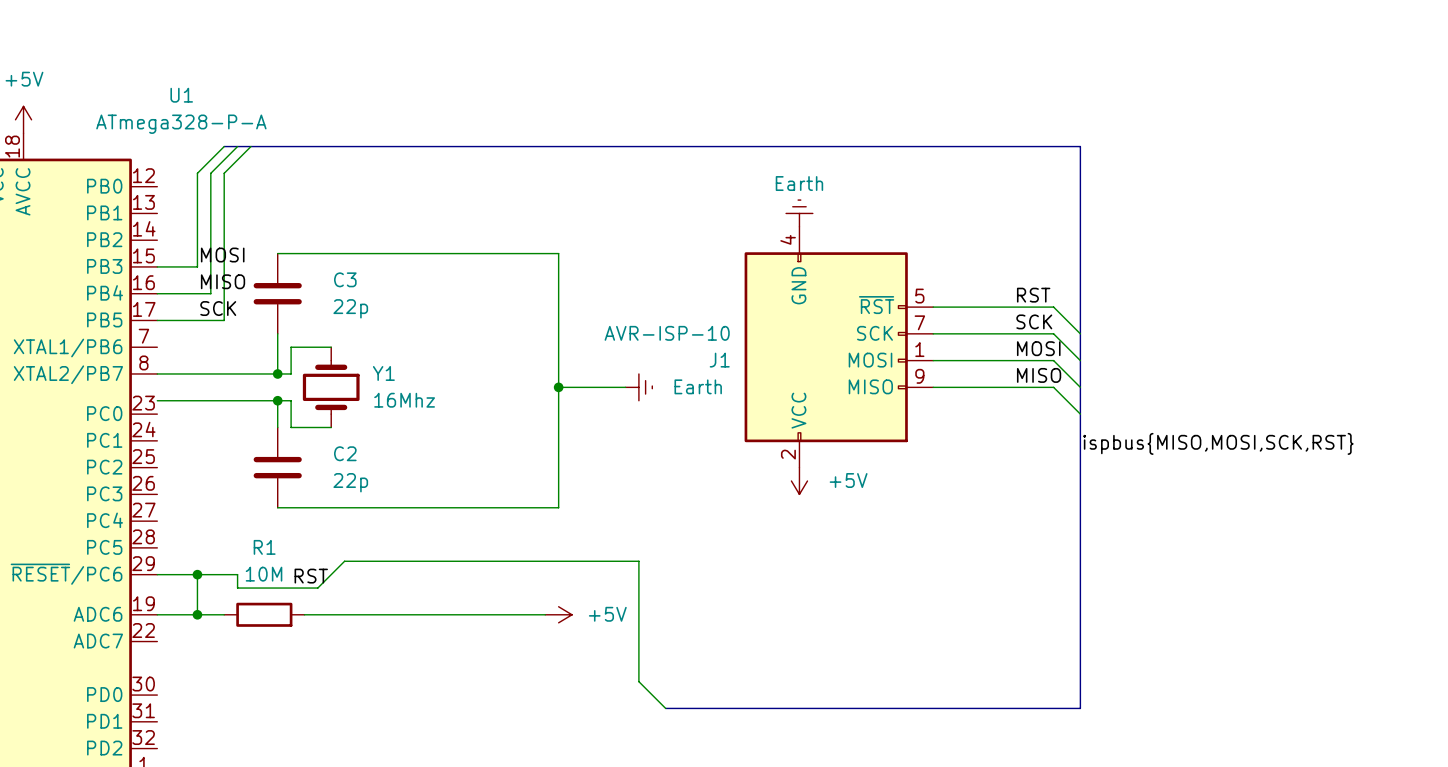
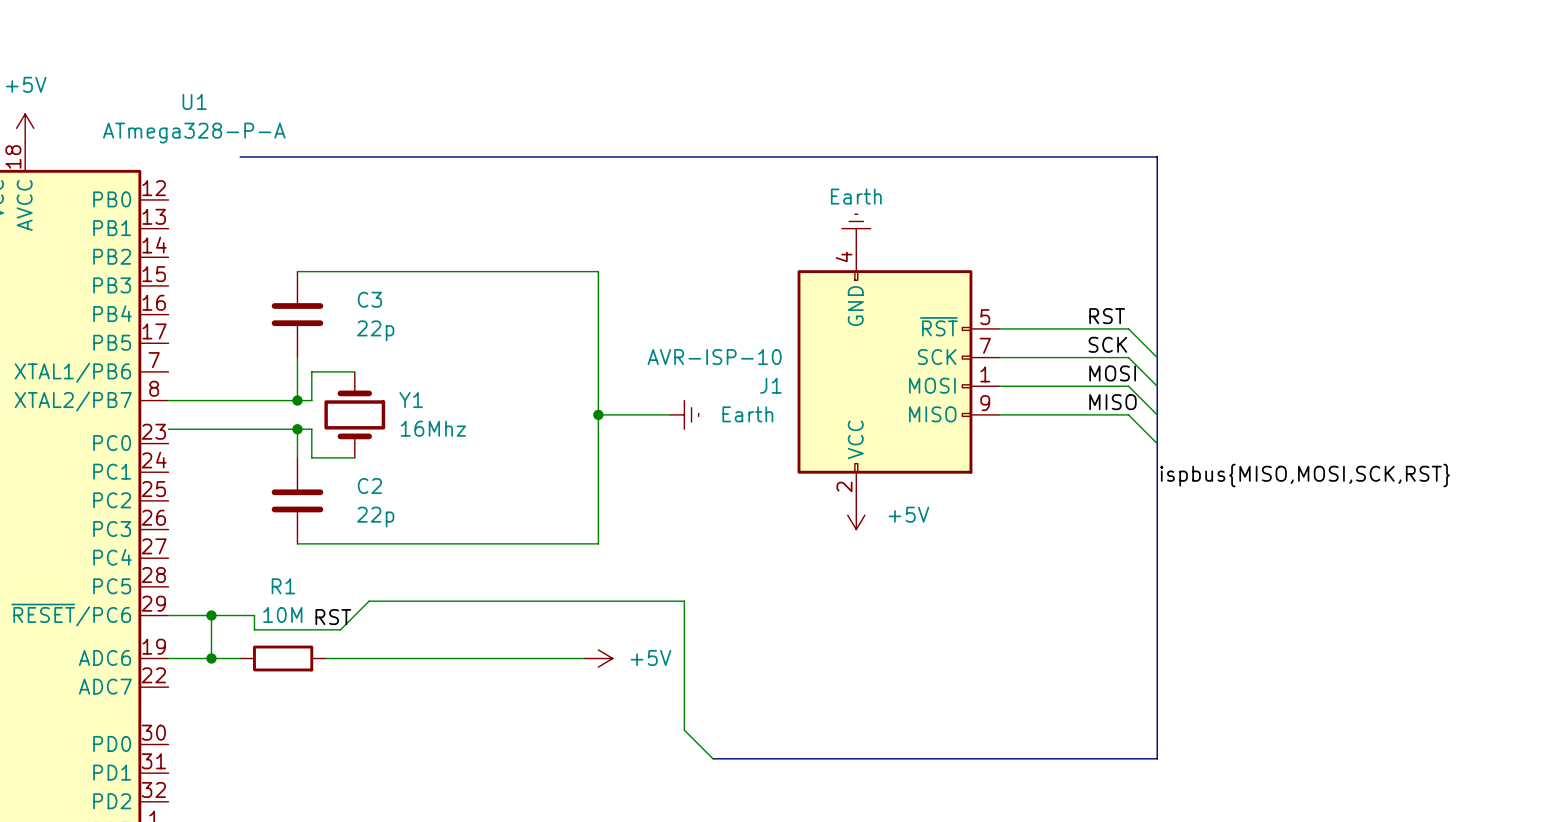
wire: (224, 146) (197, 173) (197, 266) (157, 266) -> none
wire: (237, 146) (210, 173) (210, 293) (157, 293) -> none
wire: (250, 146) (224, 173) (224, 320) (157, 320) -> none
label: MOSI (222, 255) -> none
label: MISO (223, 281) -> none
label: SCK (218, 308) -> none

